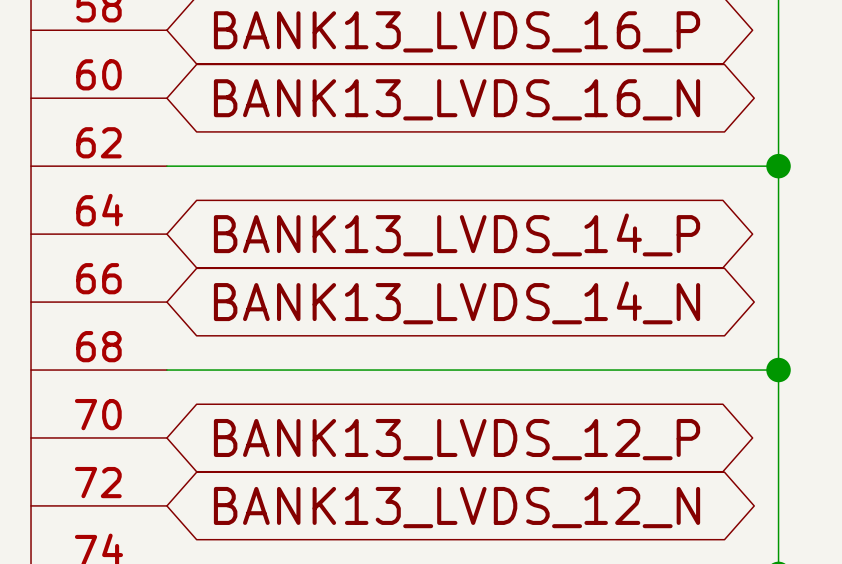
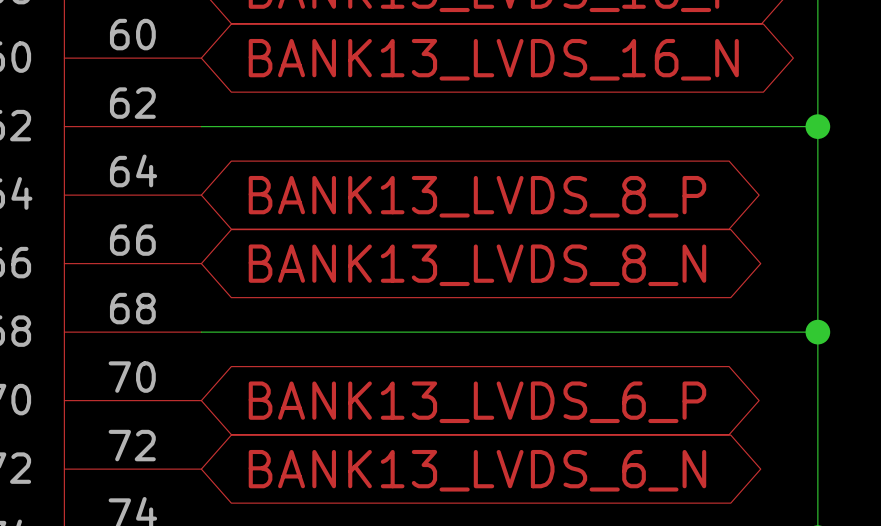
global label: BANK13_LVDS_14_P (457, 234) -> BANK13_LVDS_8_P (477, 196)
global label: BANK13_LVDS_14_N (457, 302) -> BANK13_LVDS_8_N (477, 265)
global label: BANK13_LVDS_12_P (457, 439) -> BANK13_LVDS_6_P (477, 402)
global label: BANK13_LVDS_12_N (457, 507) -> BANK13_LVDS_6_N (477, 470)

